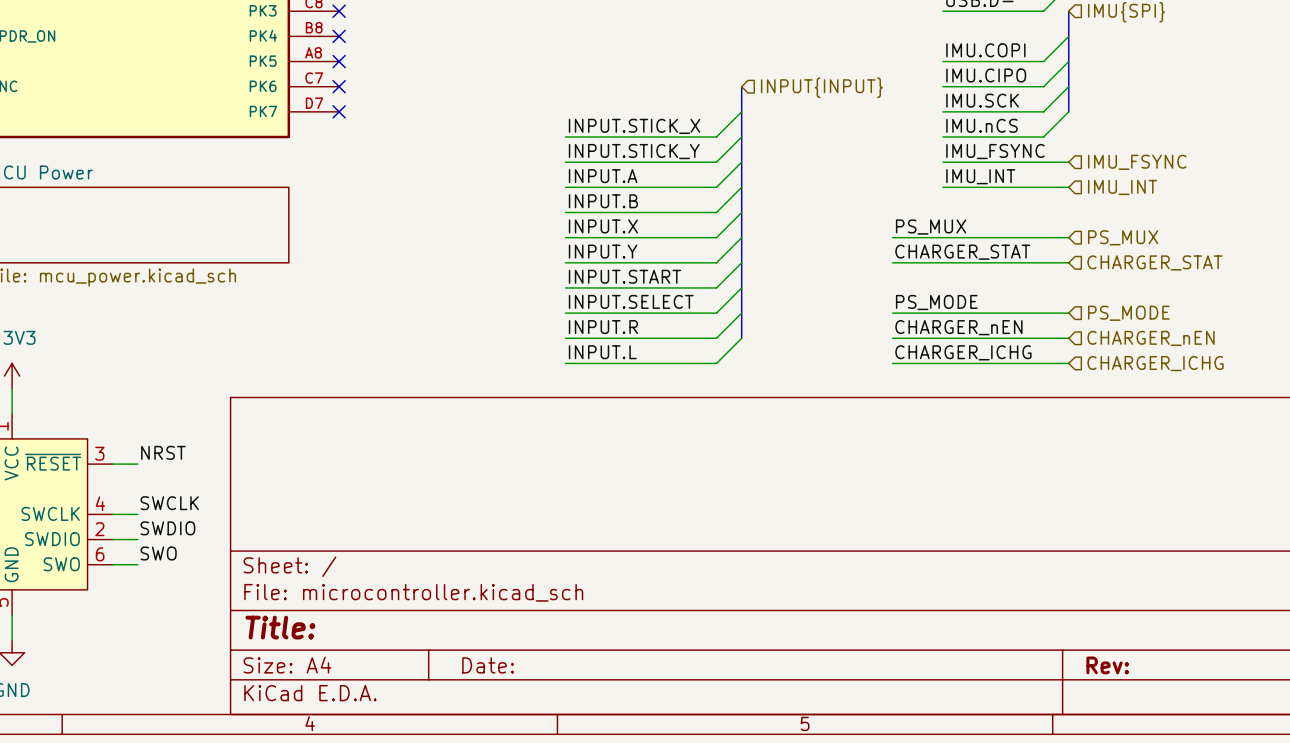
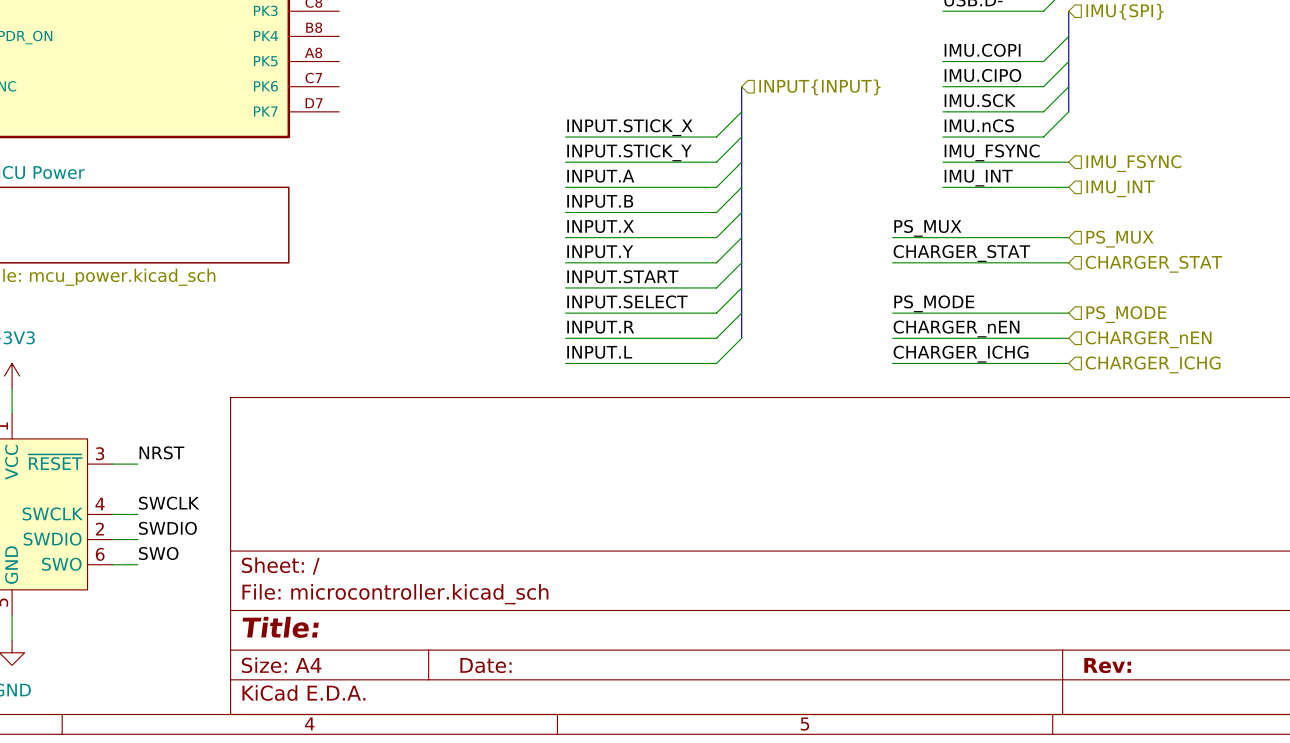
no-connect mark: (339, 11) -> none
no-connect mark: (339, 36) -> none
no-connect mark: (339, 61) -> none
no-connect mark: (339, 86) -> none
no-connect mark: (339, 111) -> none

